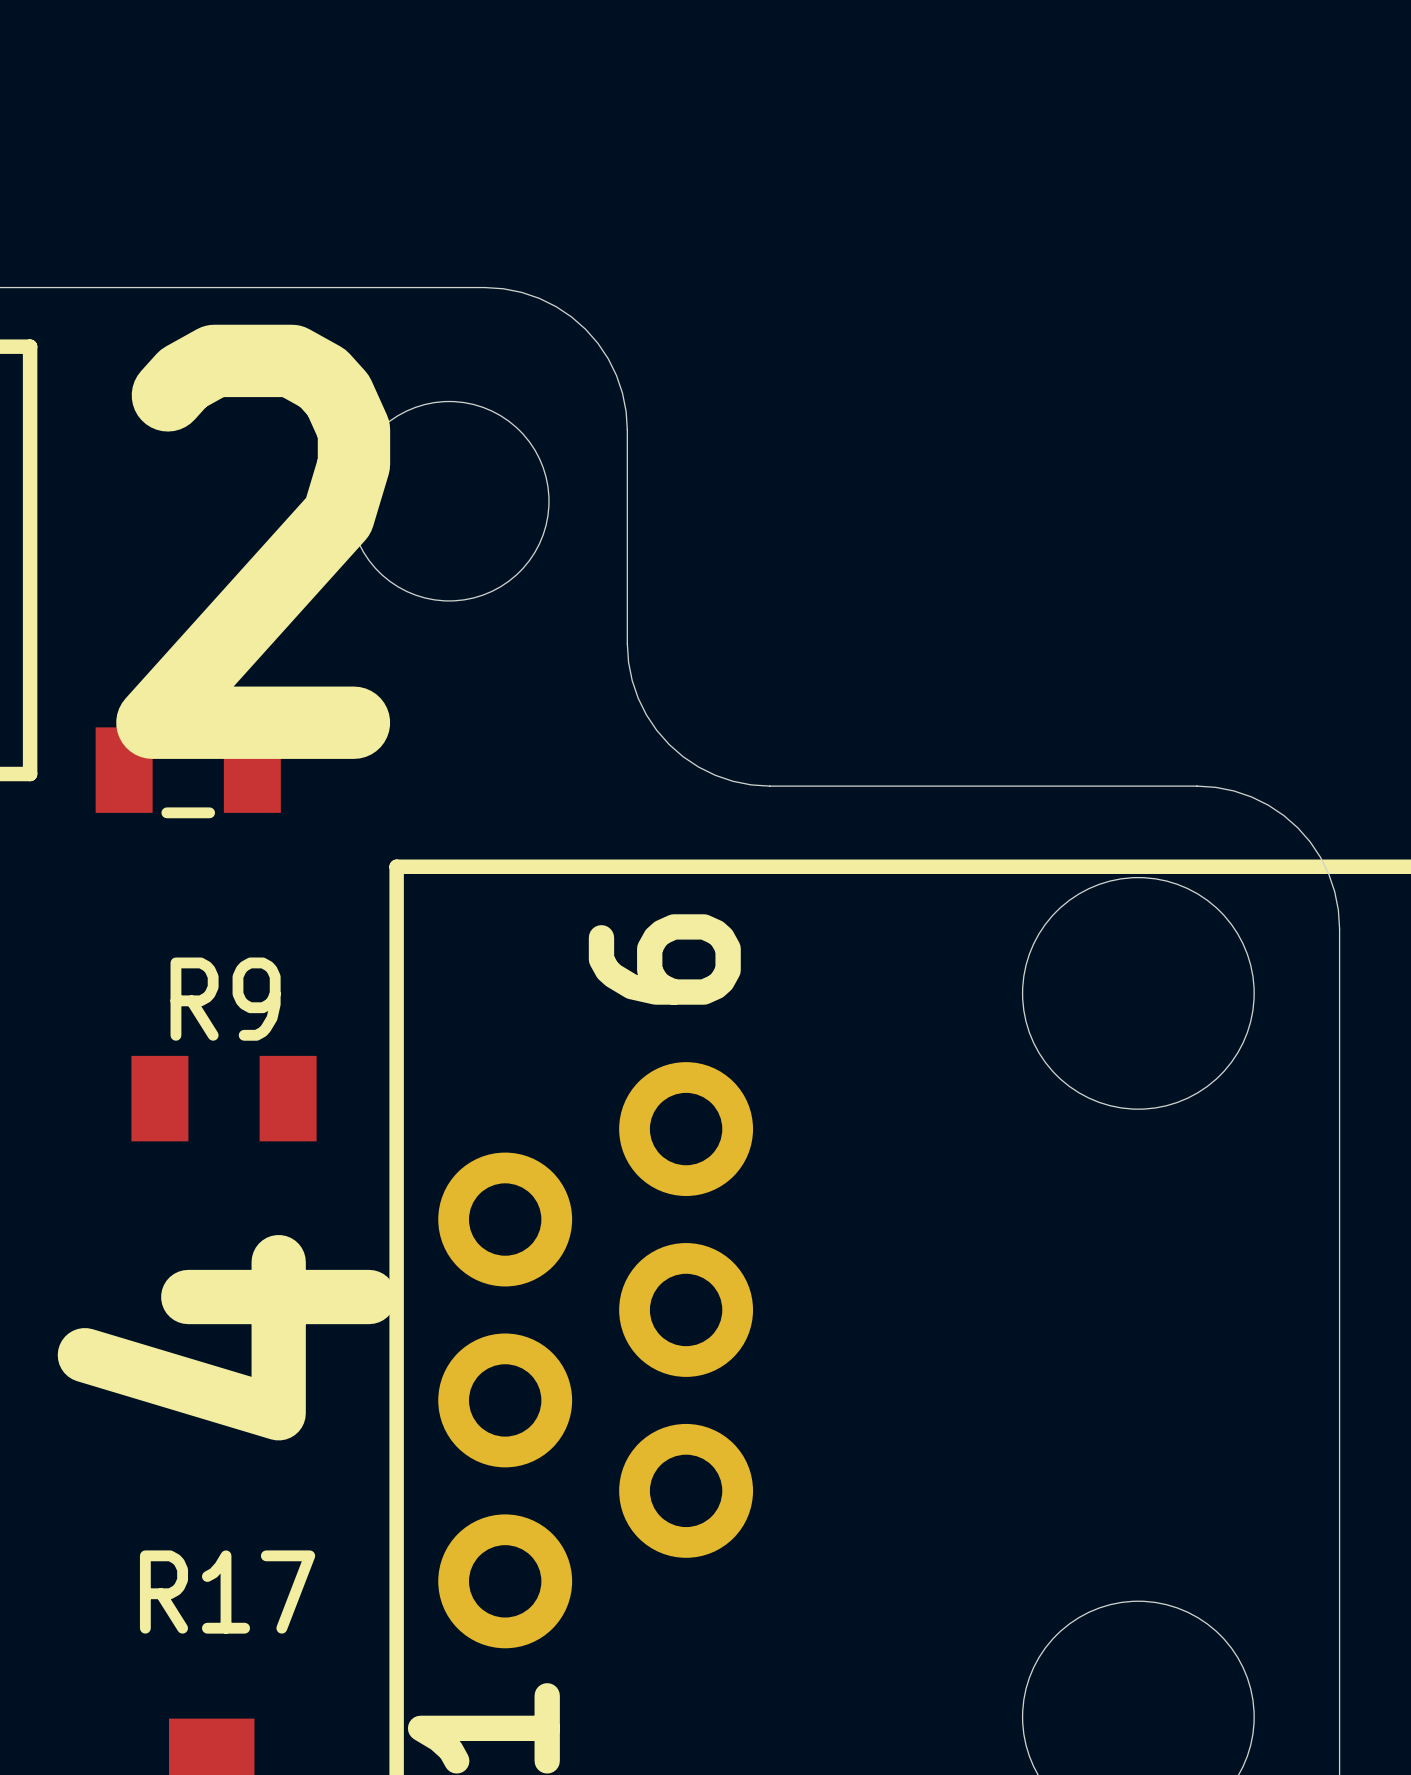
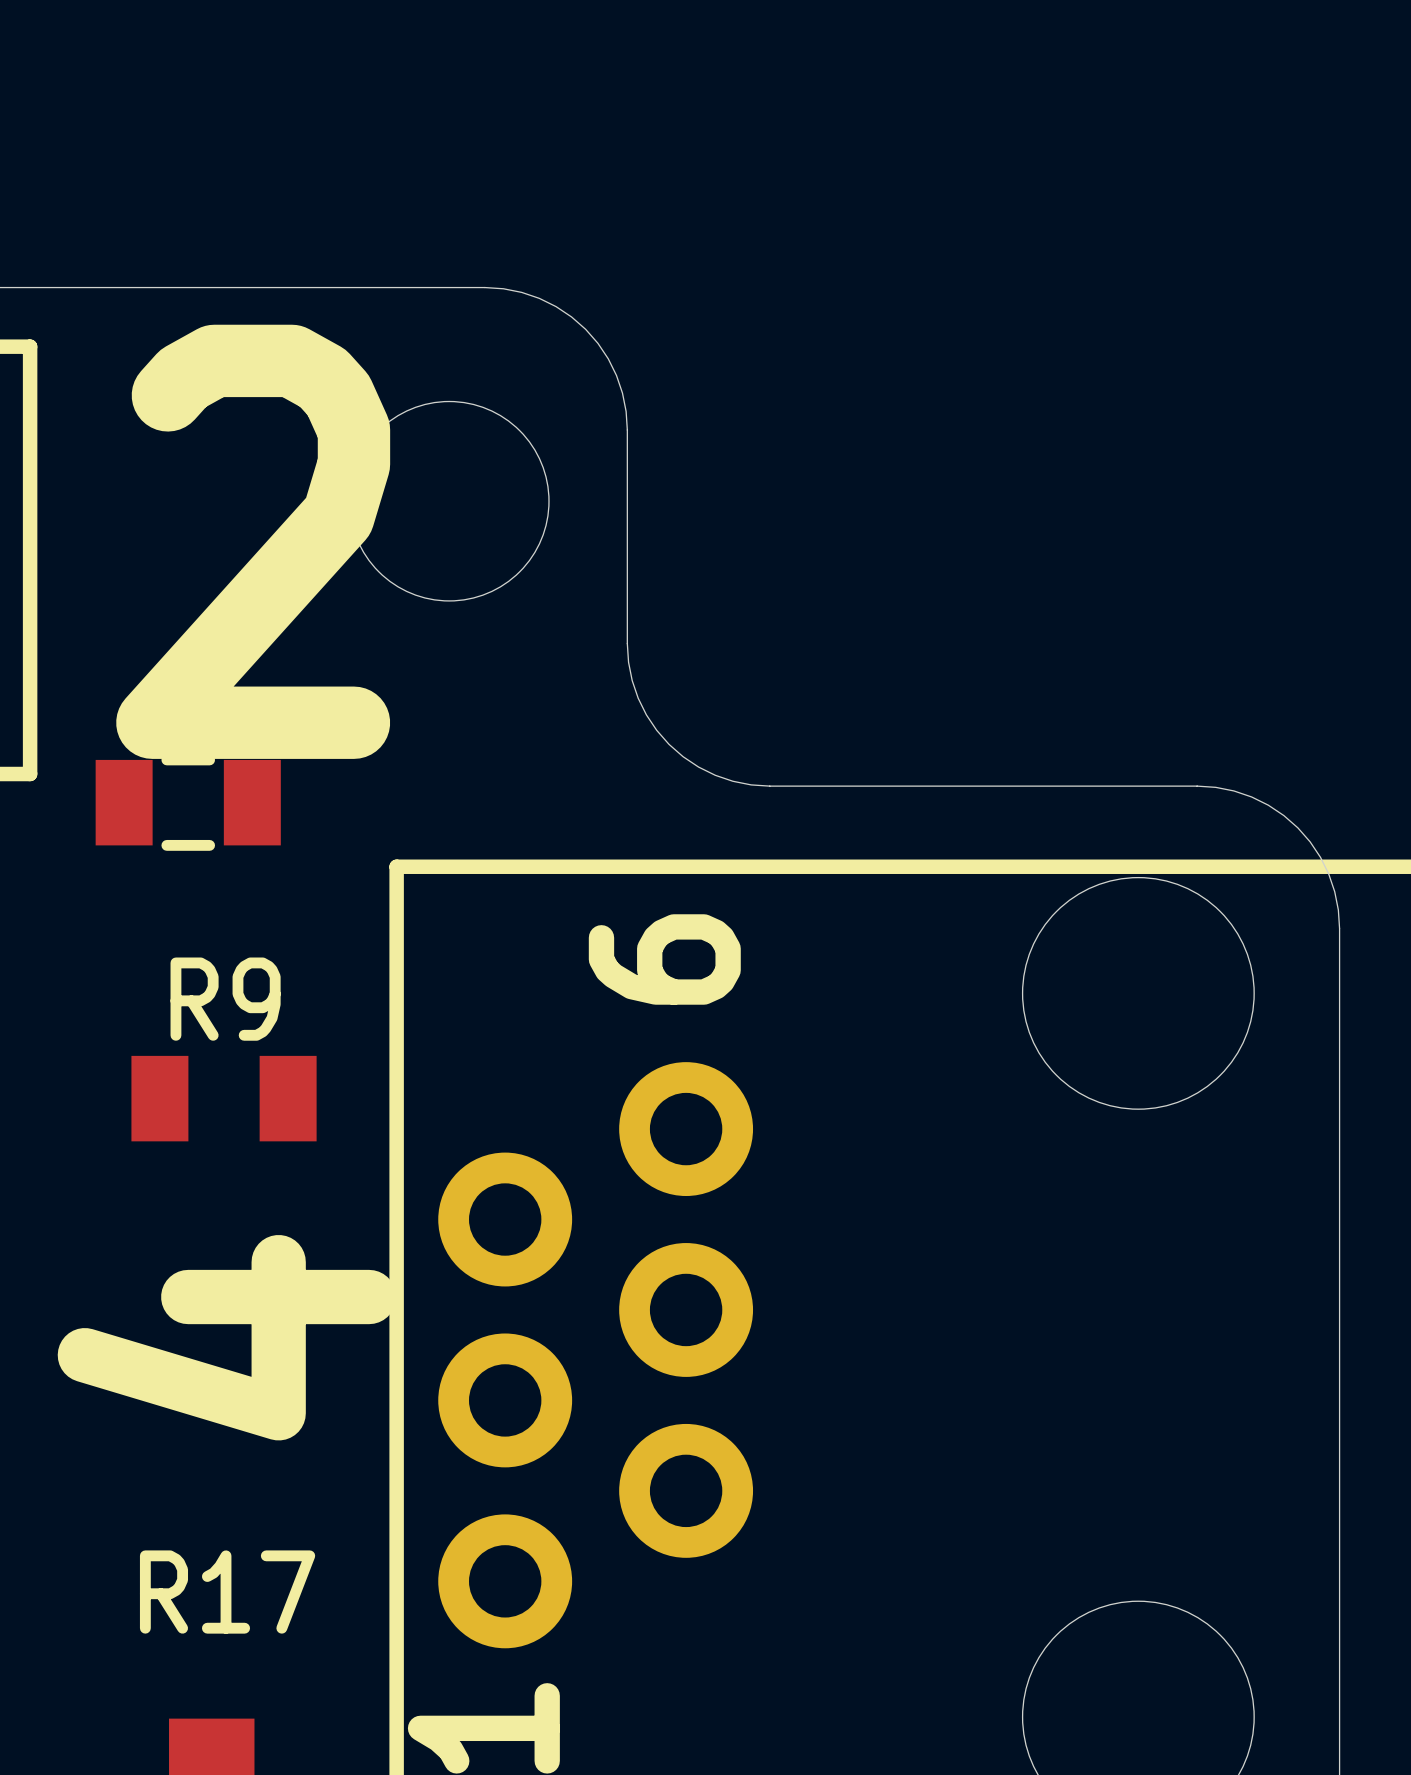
part position: (188, 770) -> (188, 802)

